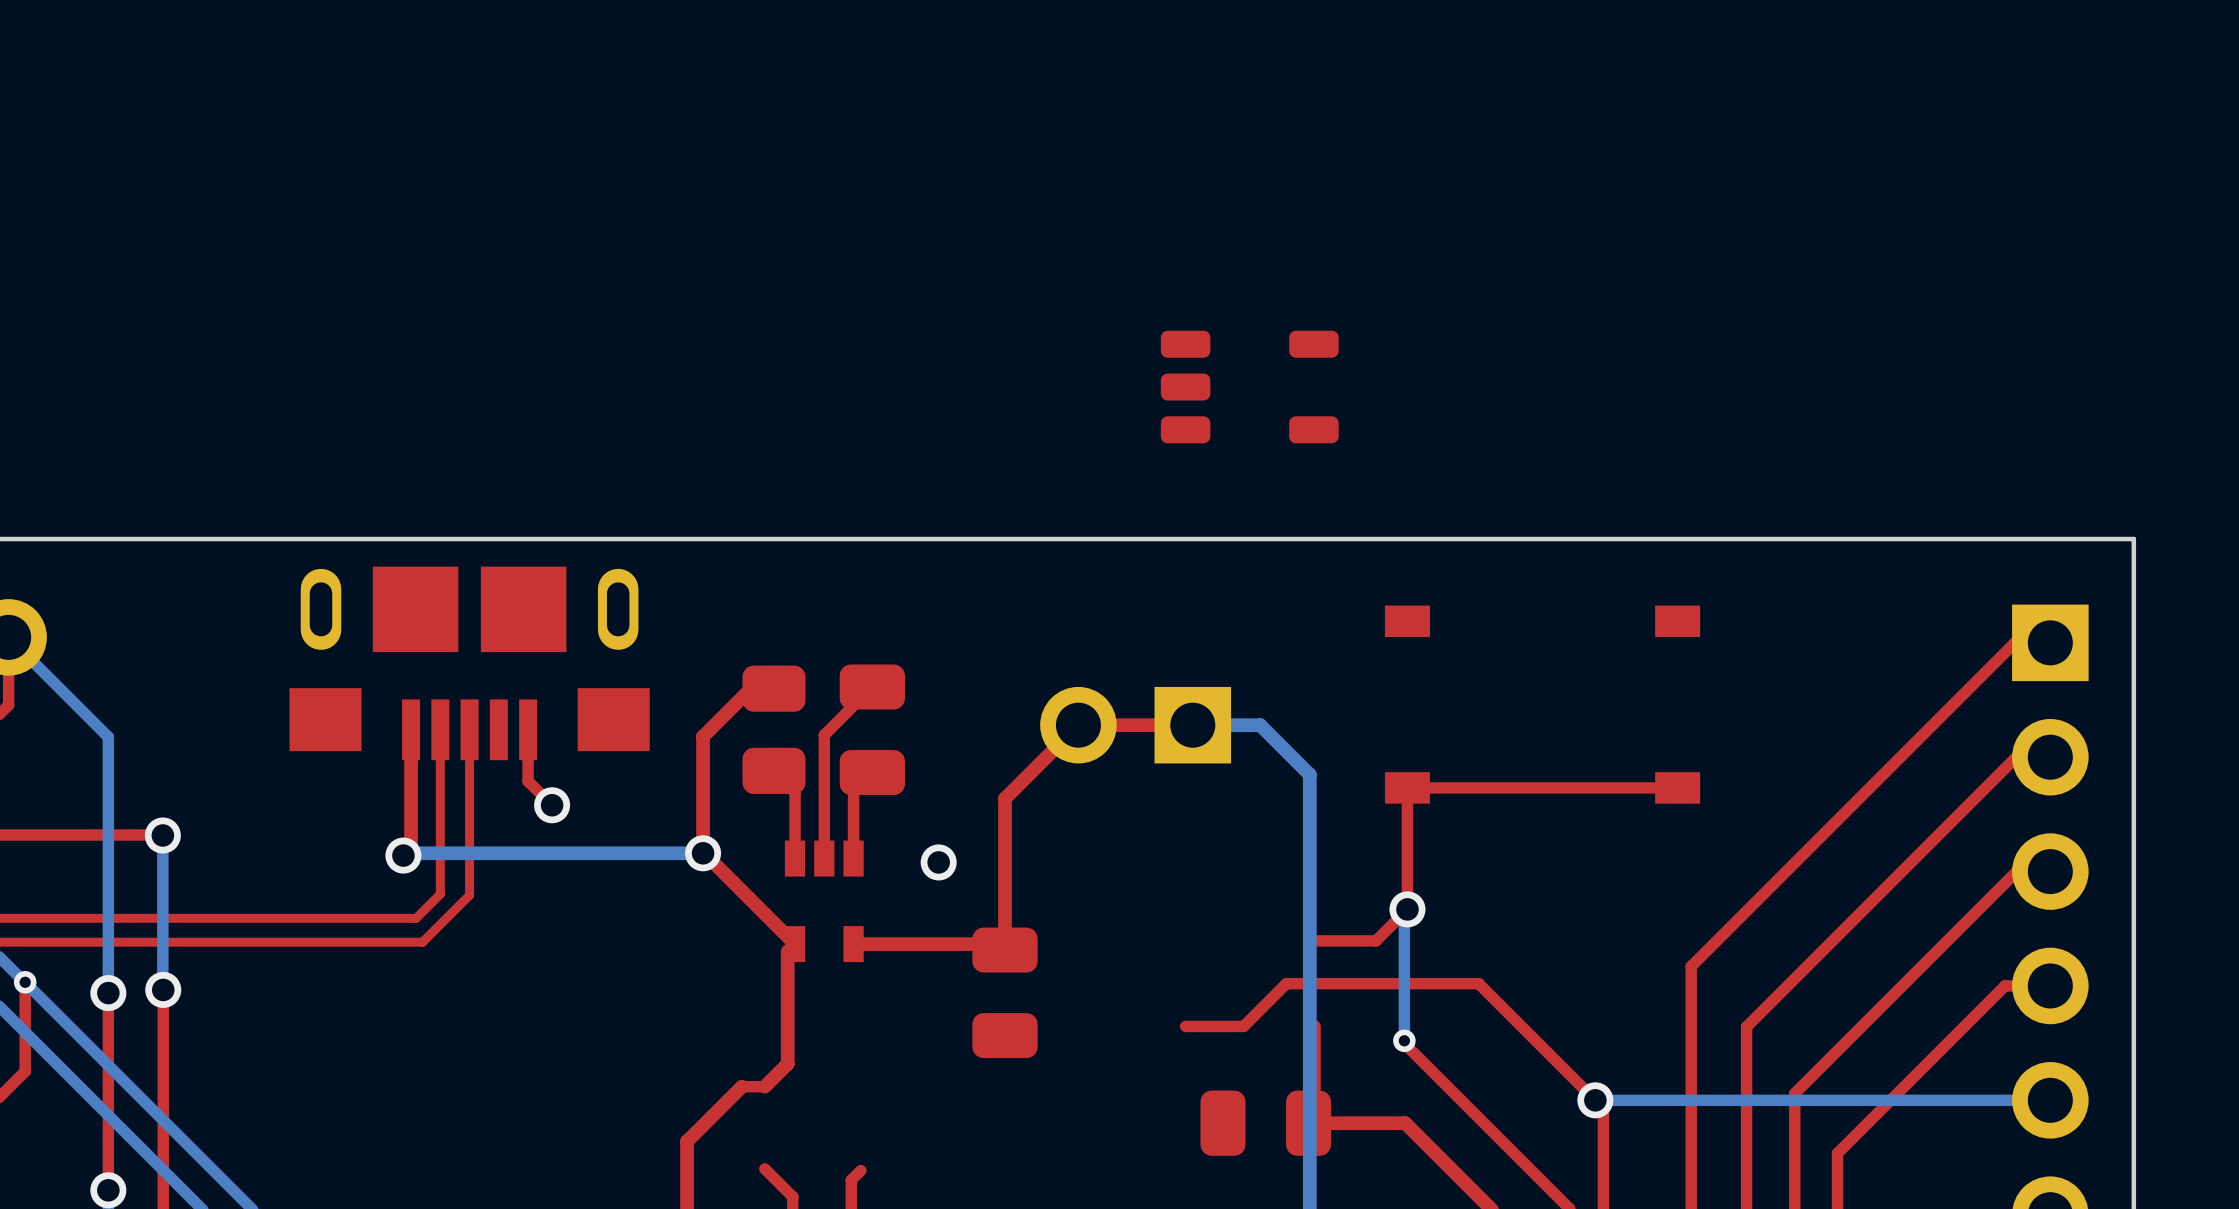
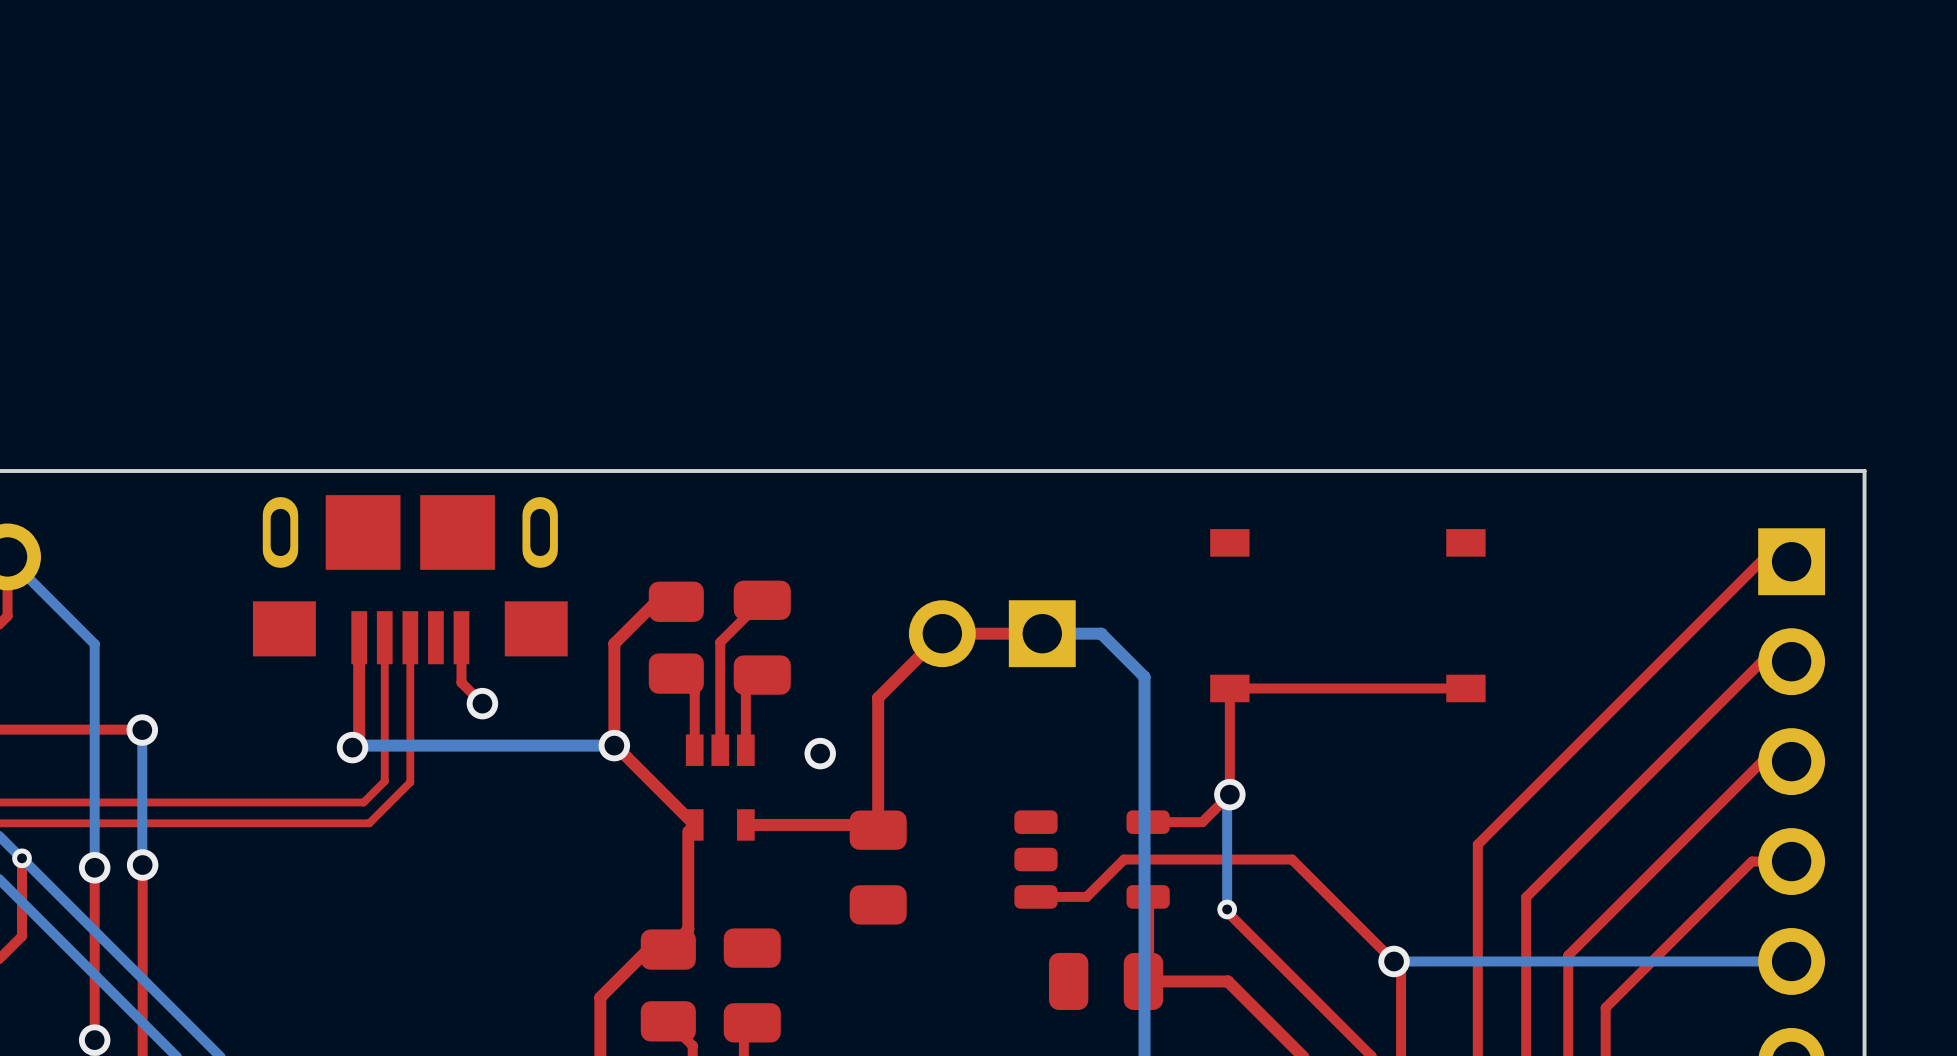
part position: (1249, 387) -> (1092, 859)
part: none -> (668, 985)
part: none -> (752, 985)

